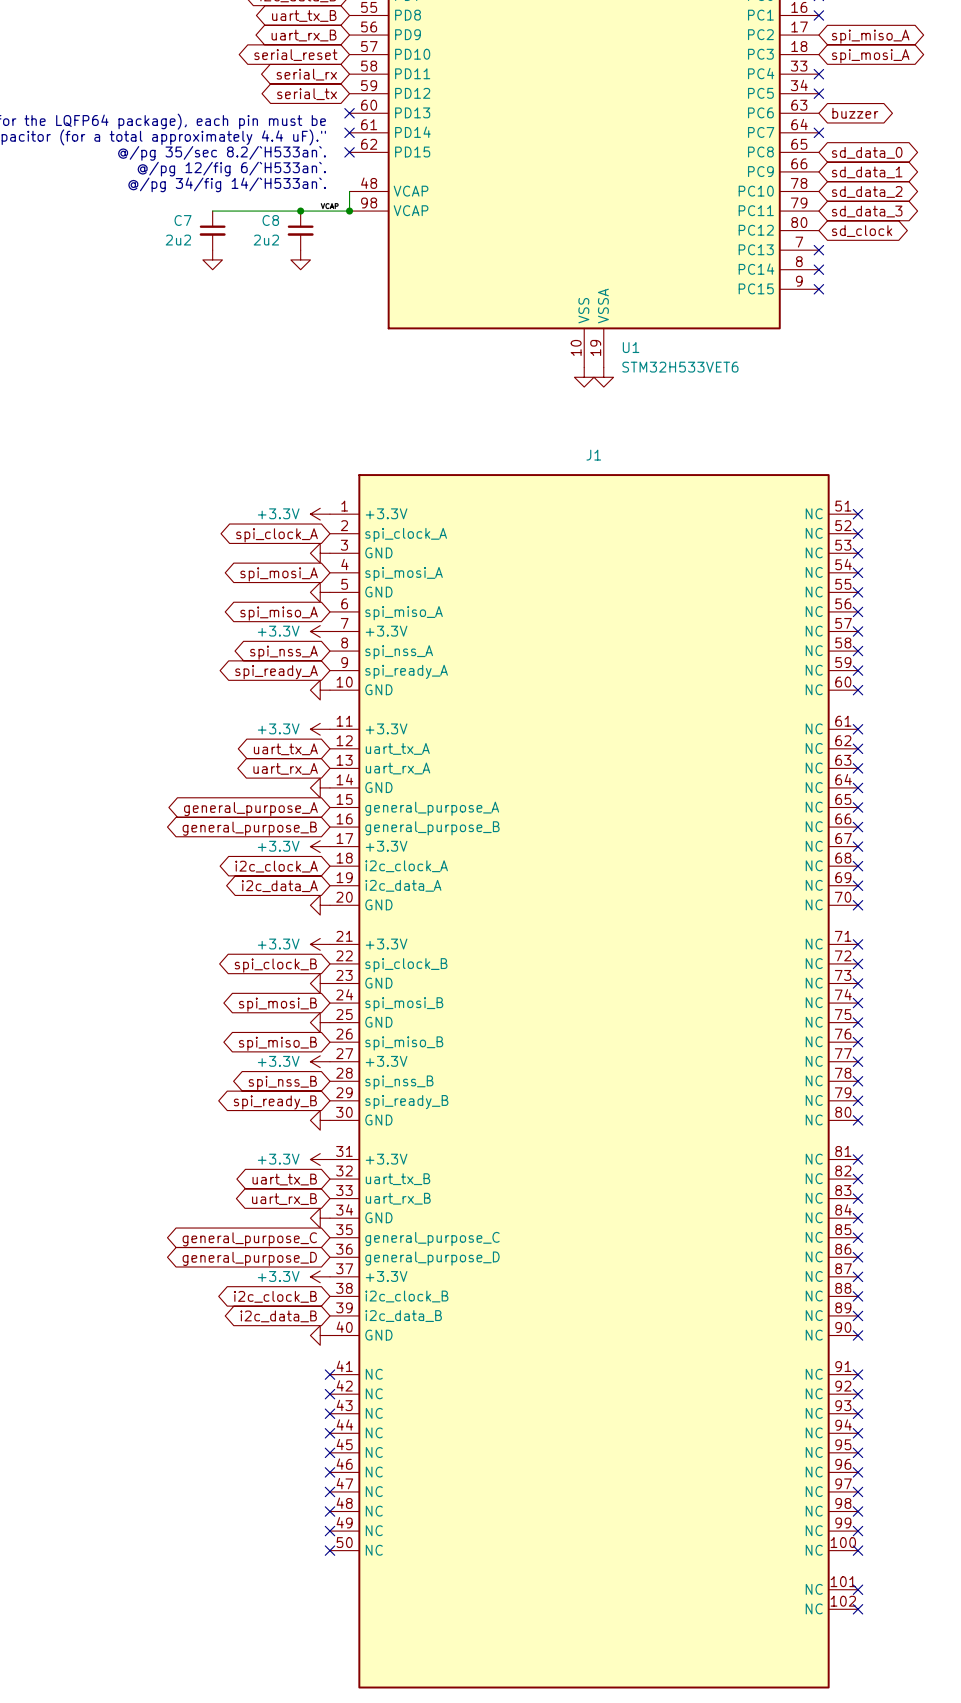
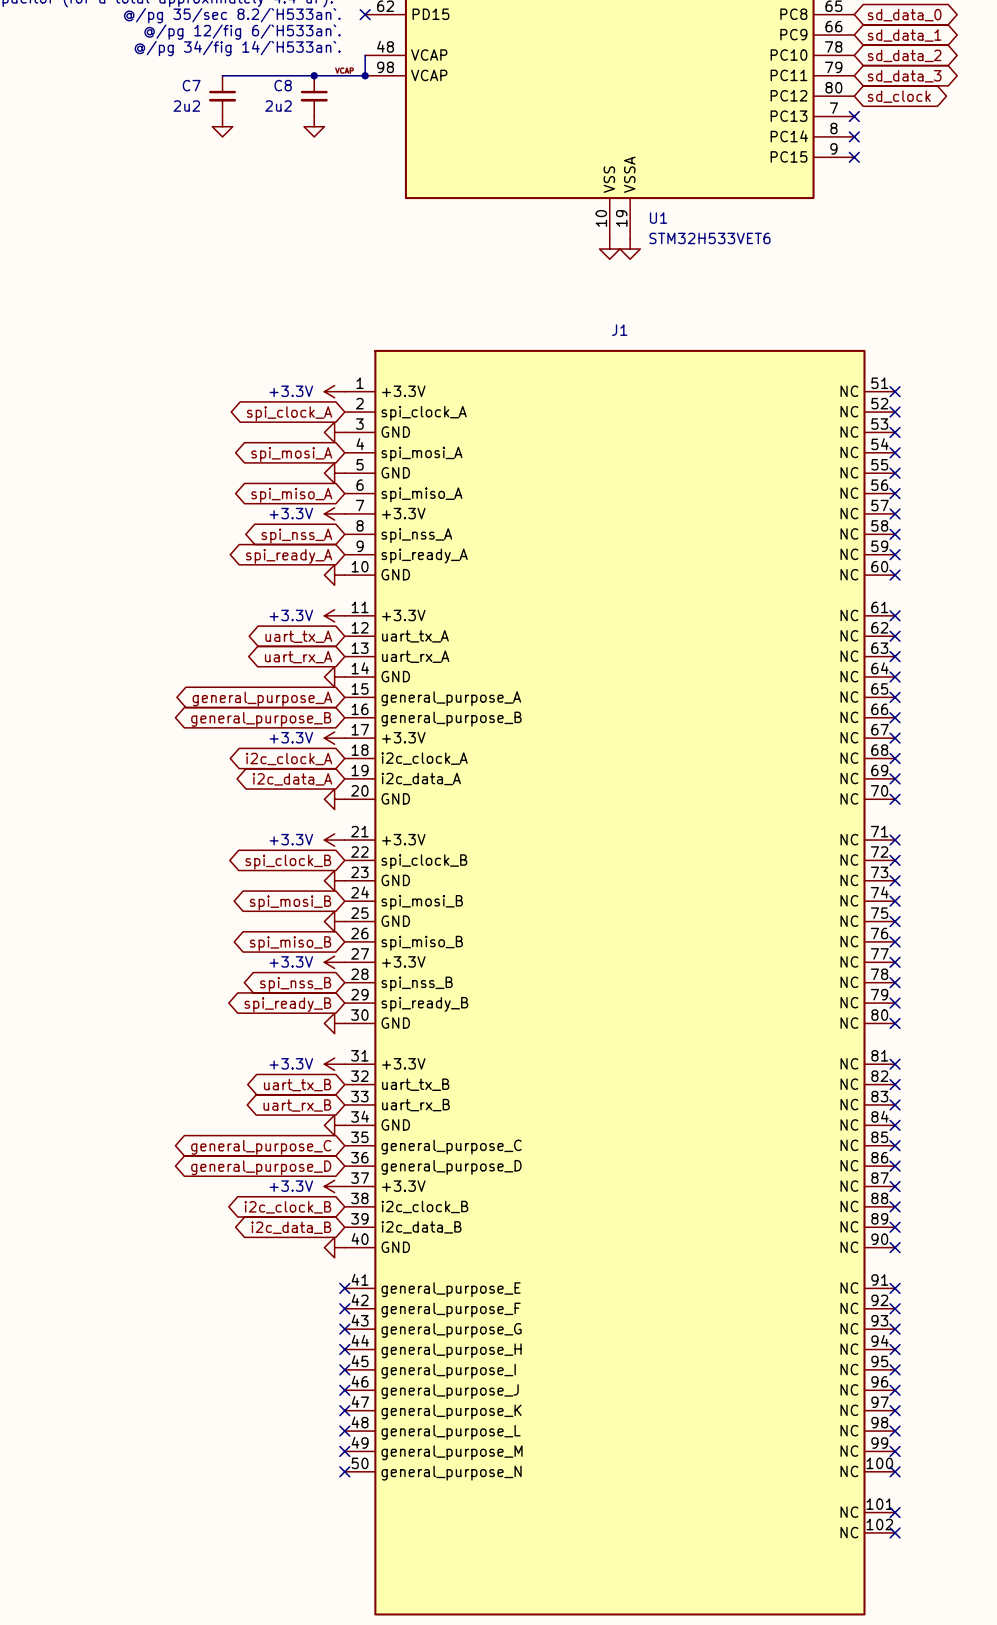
J1 symbol: [329, 474, 859, 1689] -> [344, 349, 896, 1616]

